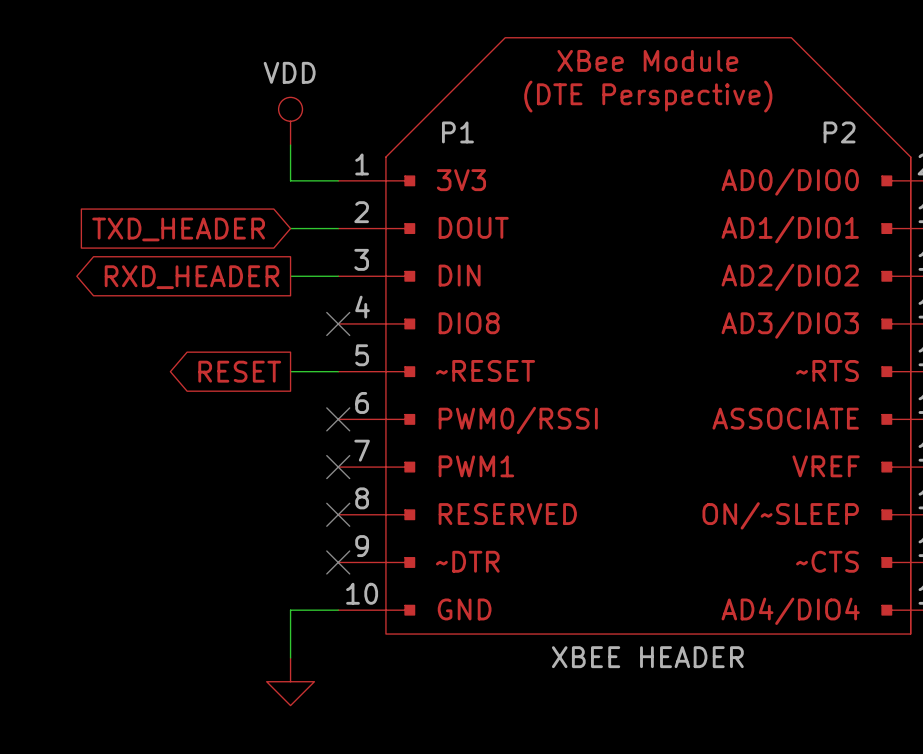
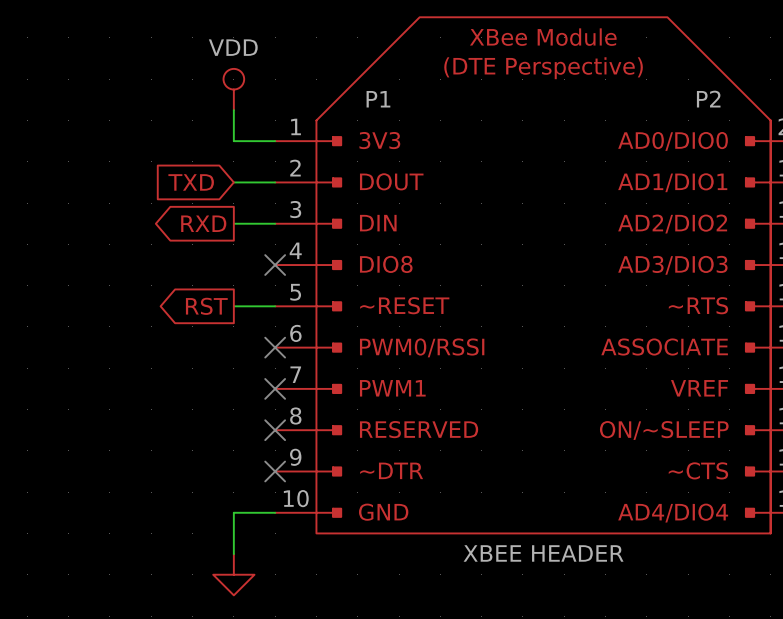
global label: TXD_HEADER (178, 229) -> TXD (191, 182)
global label: RXD_HEADER (192, 277) -> RXD (203, 223)
global label: RESET (239, 371) -> RST (206, 306)

